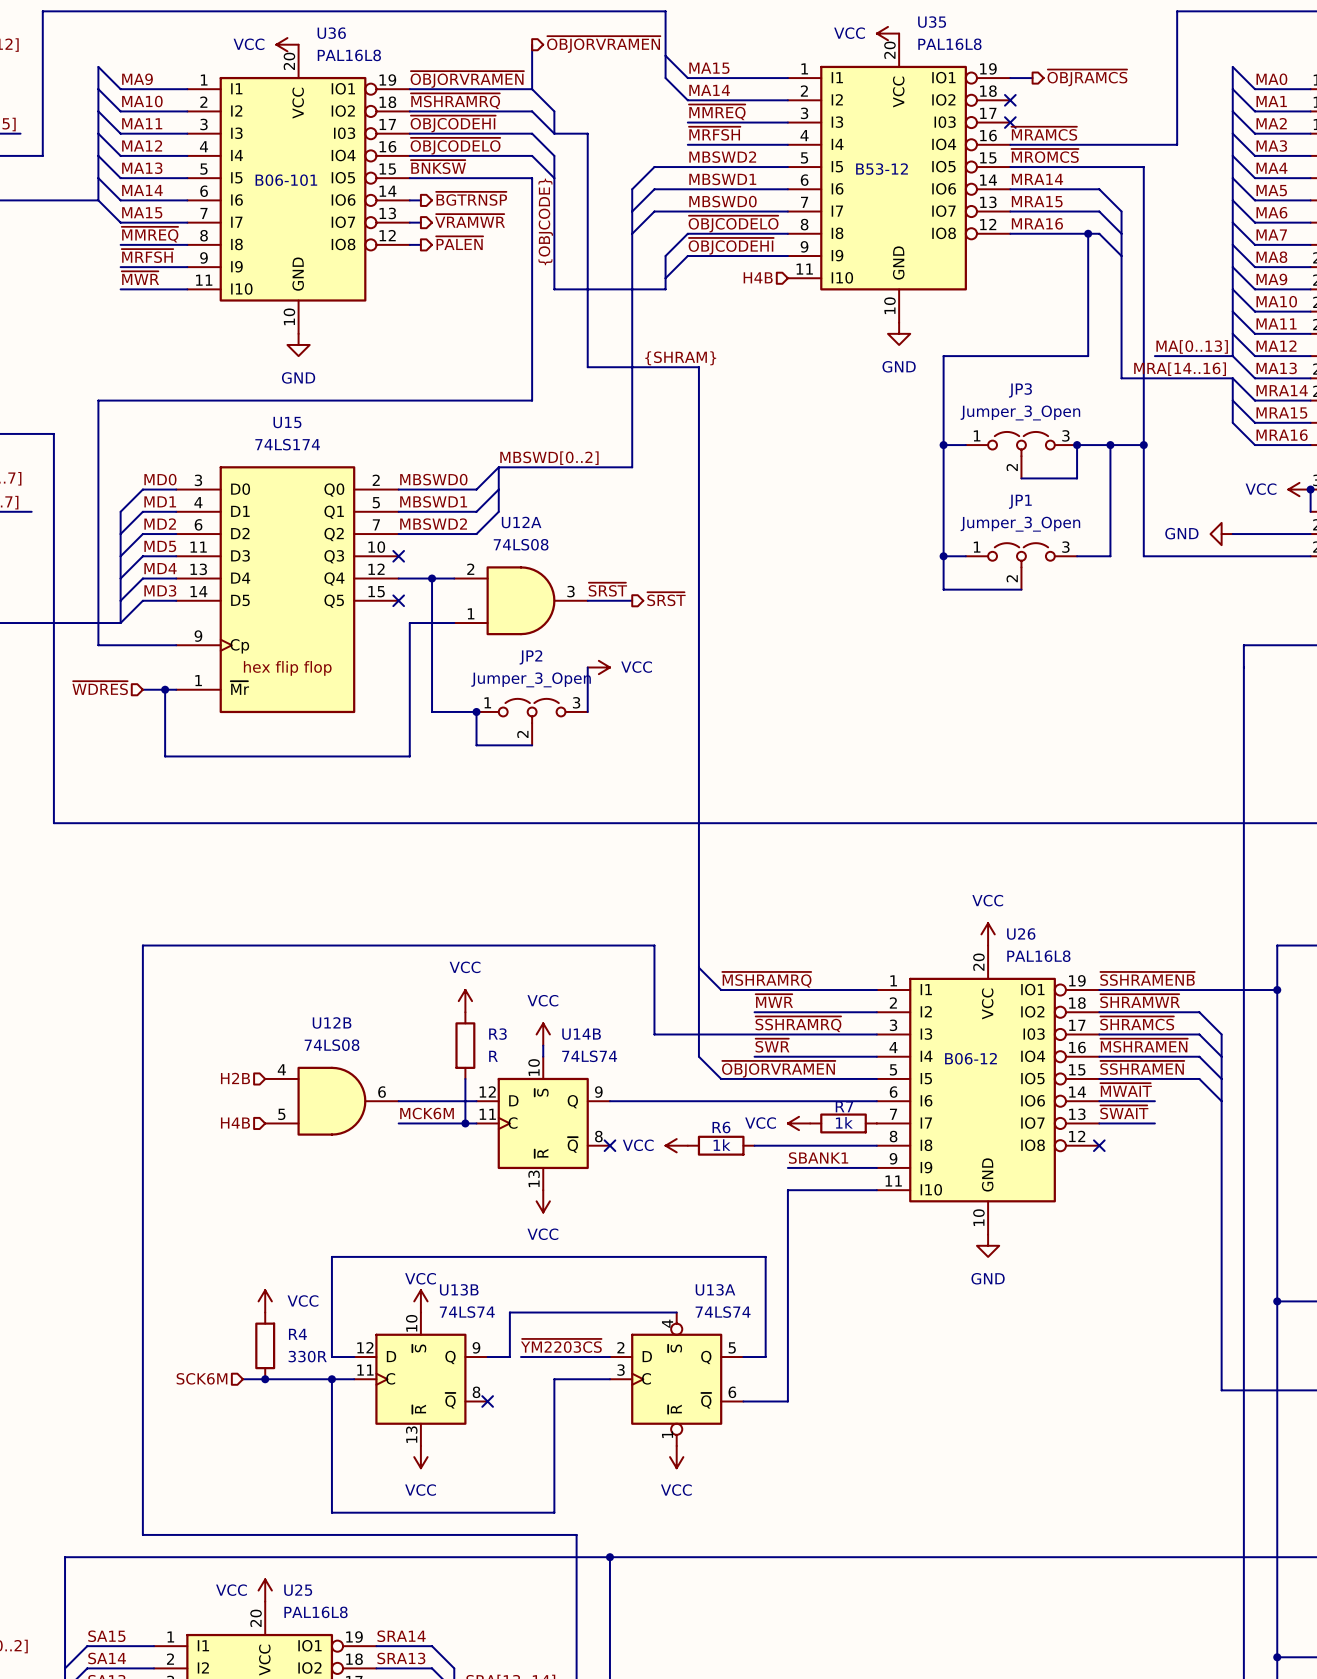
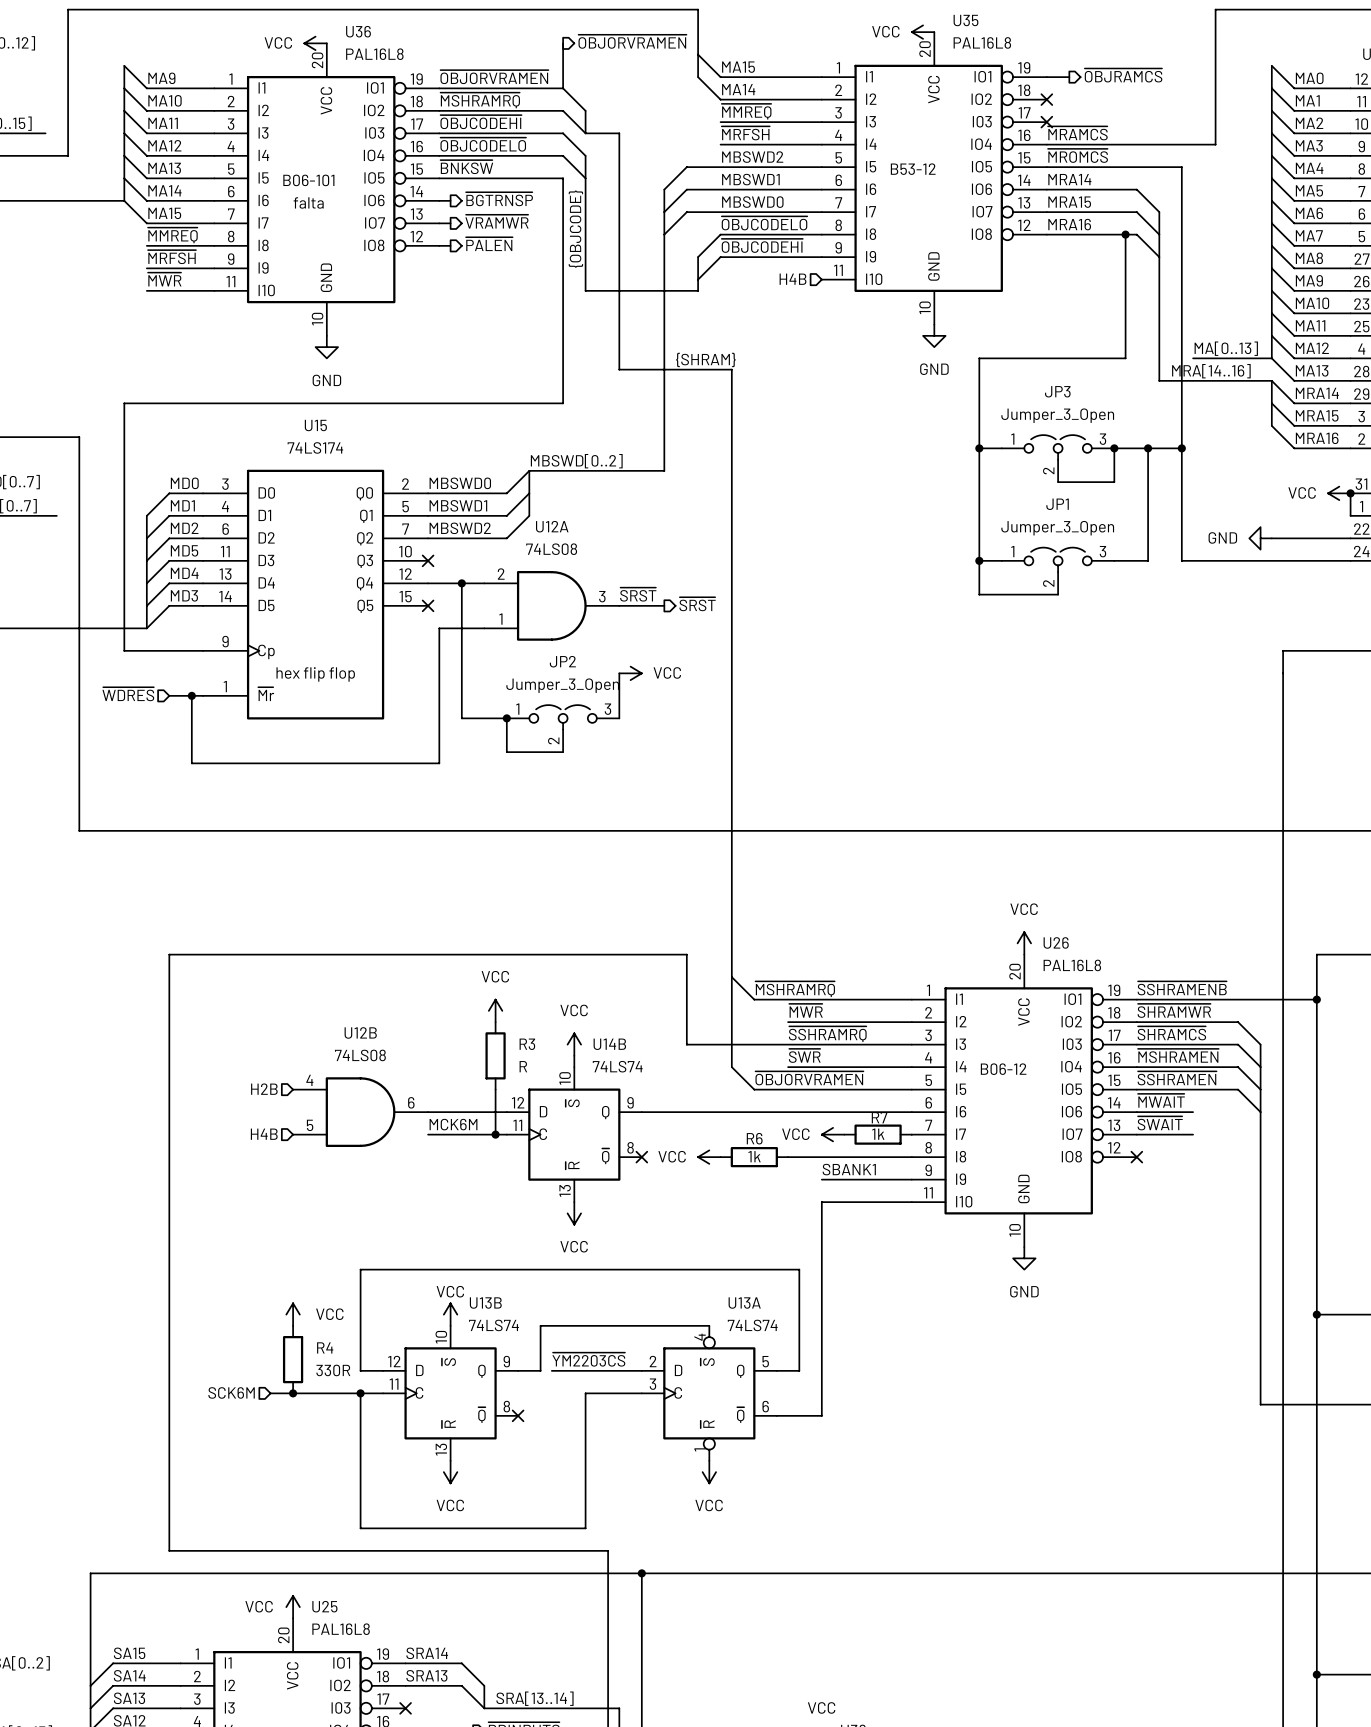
text: none -> falta (308, 202)

